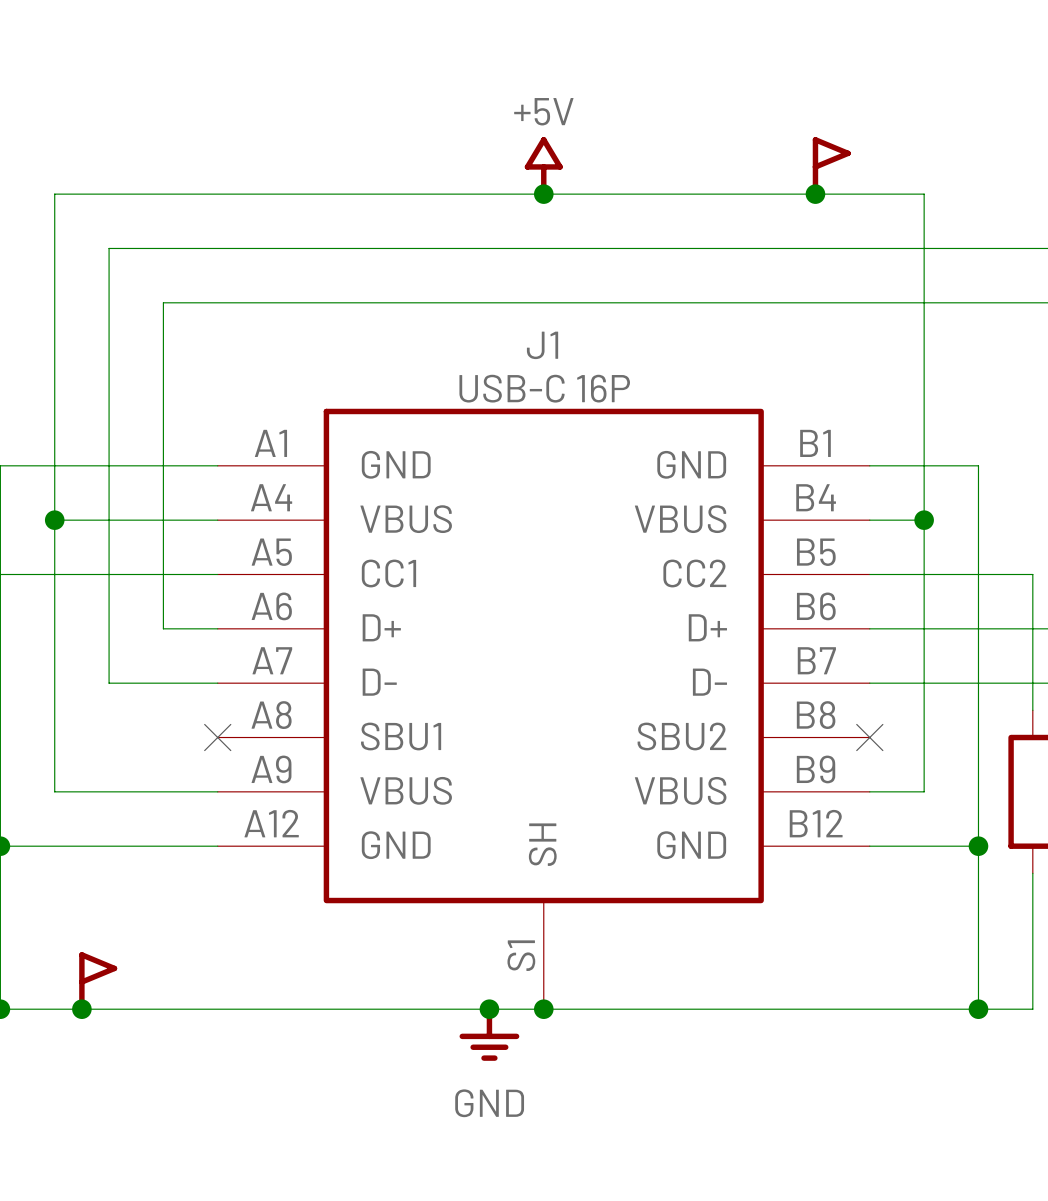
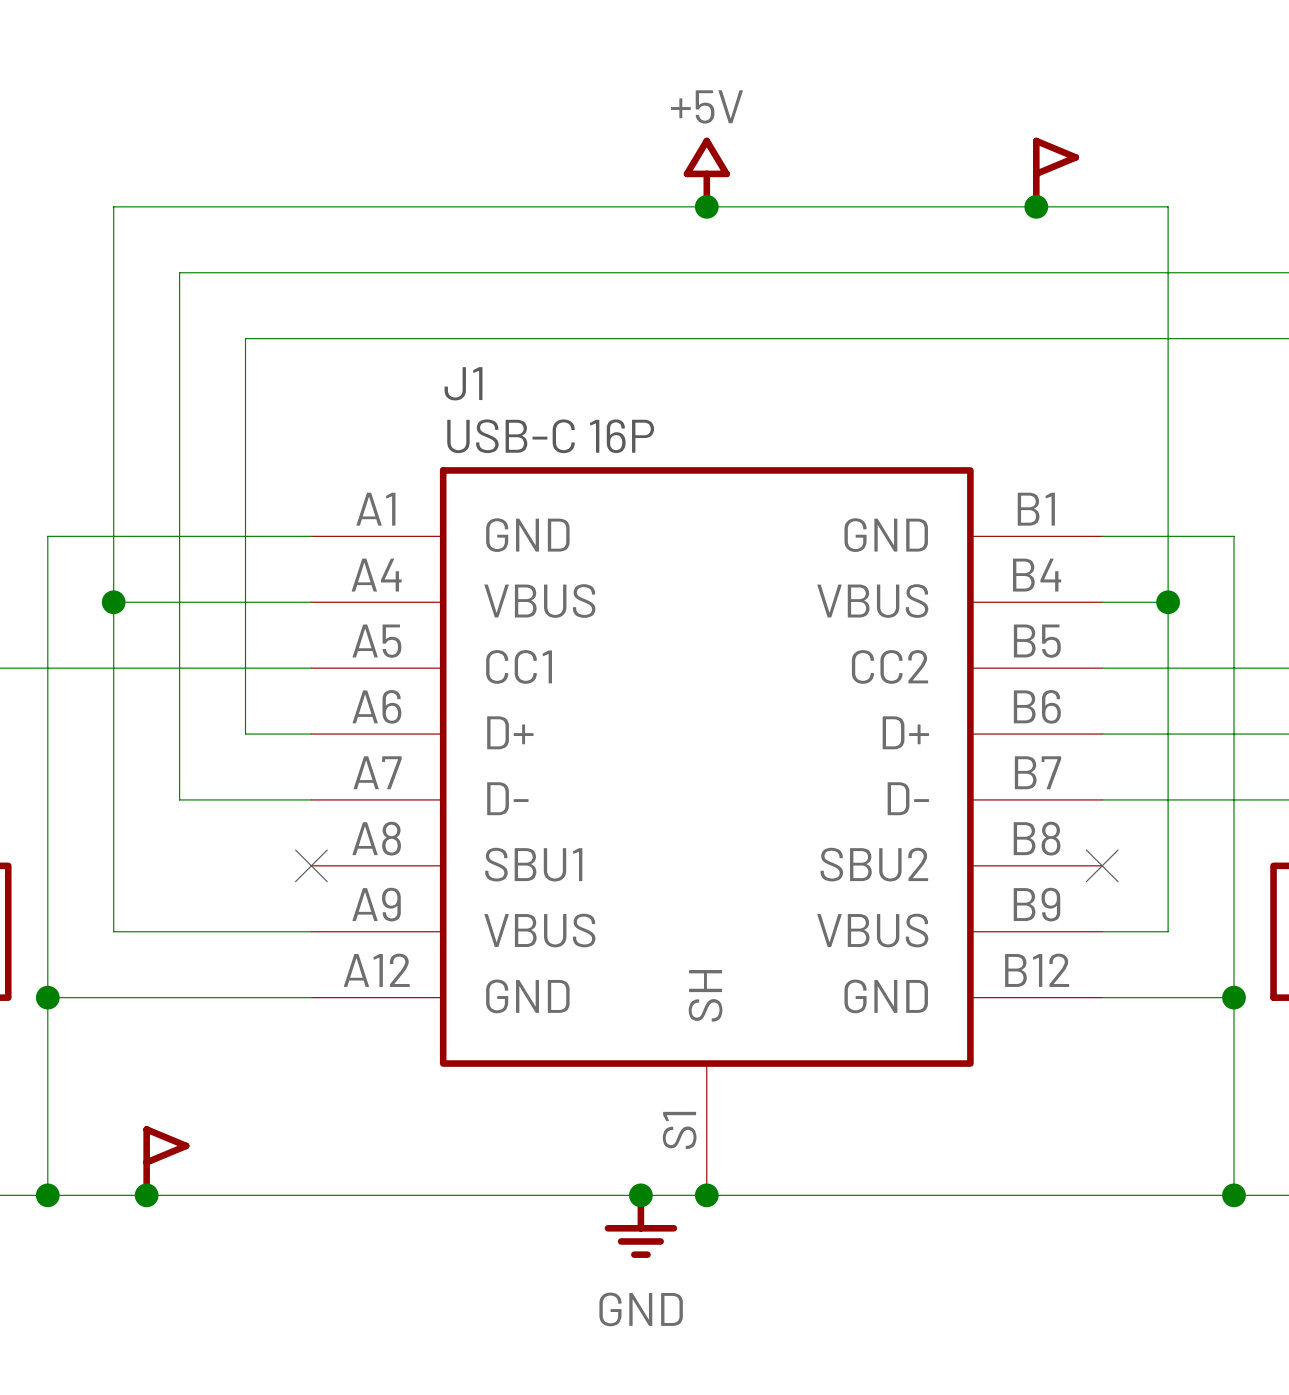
text: none -> J1 (463, 383)
J1 name: J1 (542, 345) -> none
text: none -> USB-C 16P (550, 436)
J1 value: USB-C 16P (544, 388) -> none

